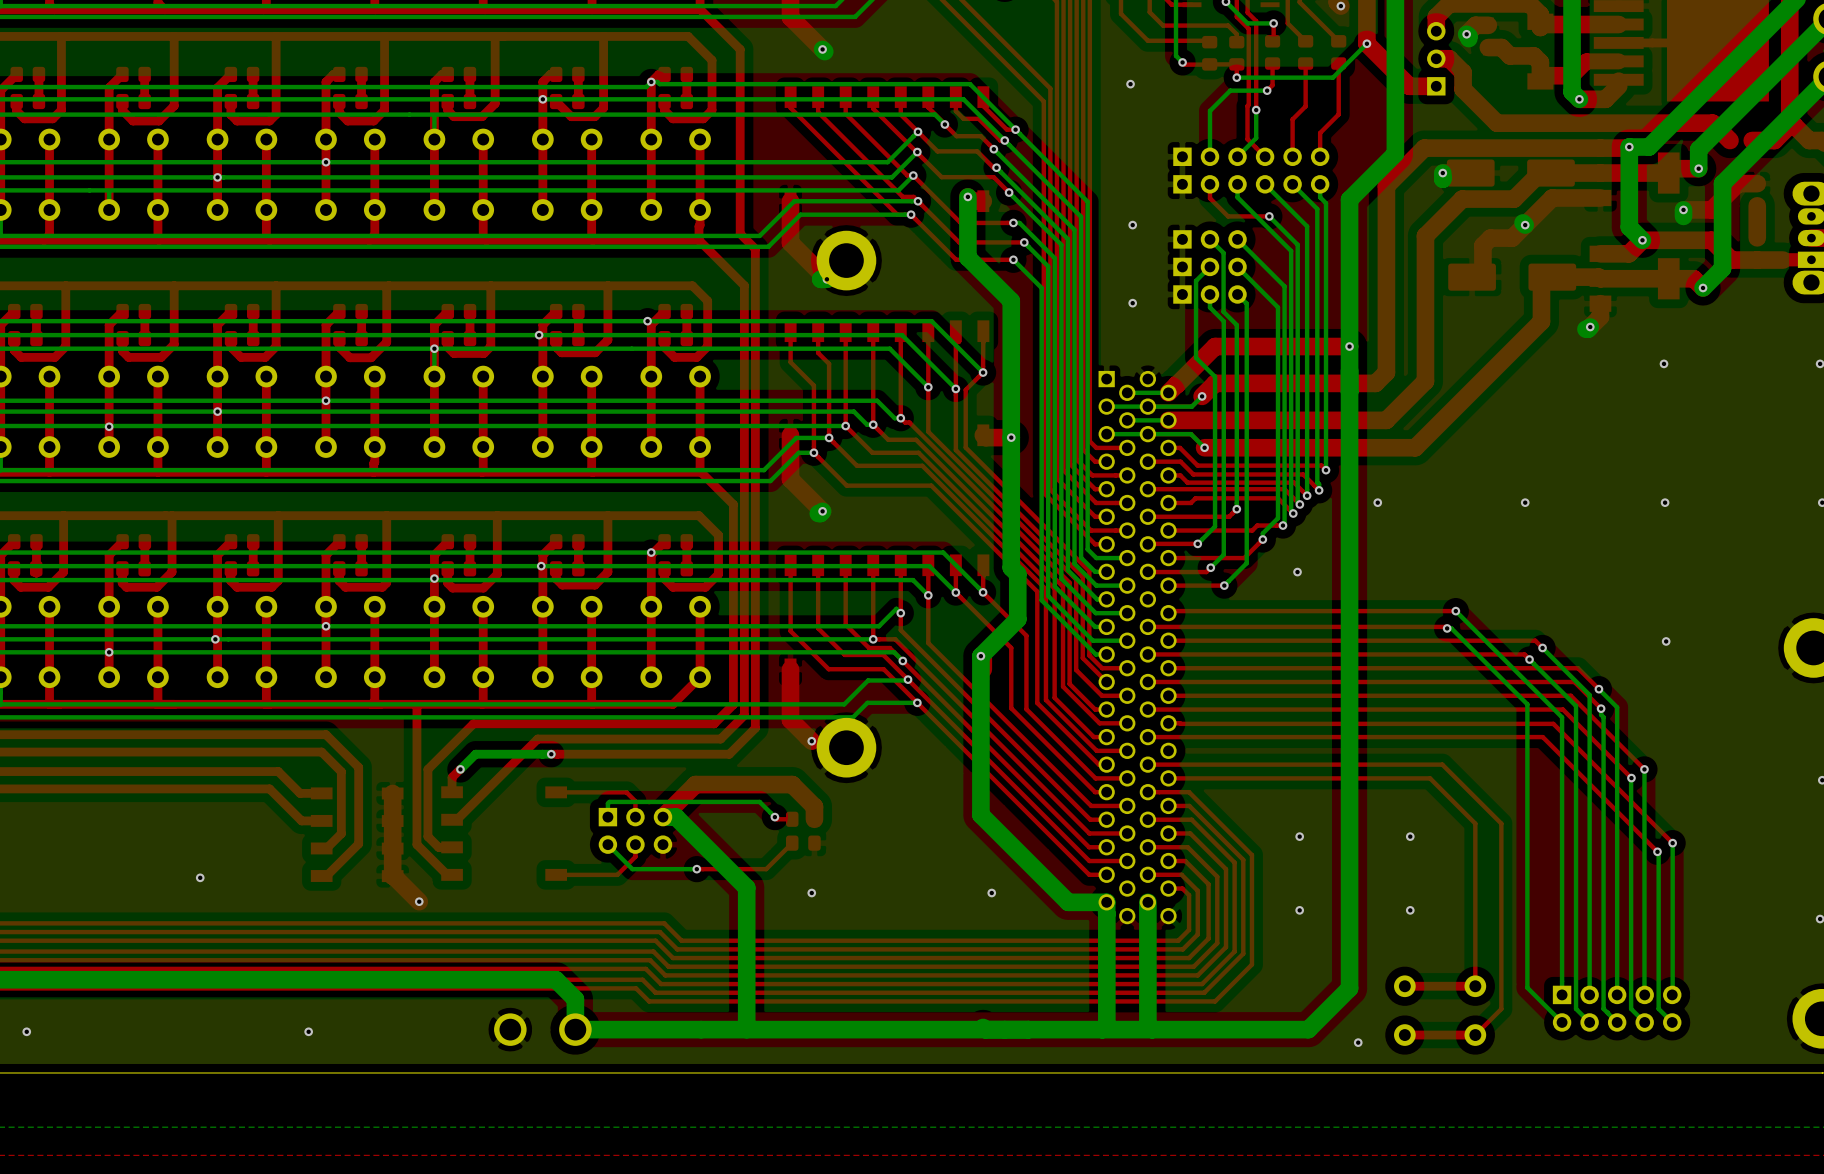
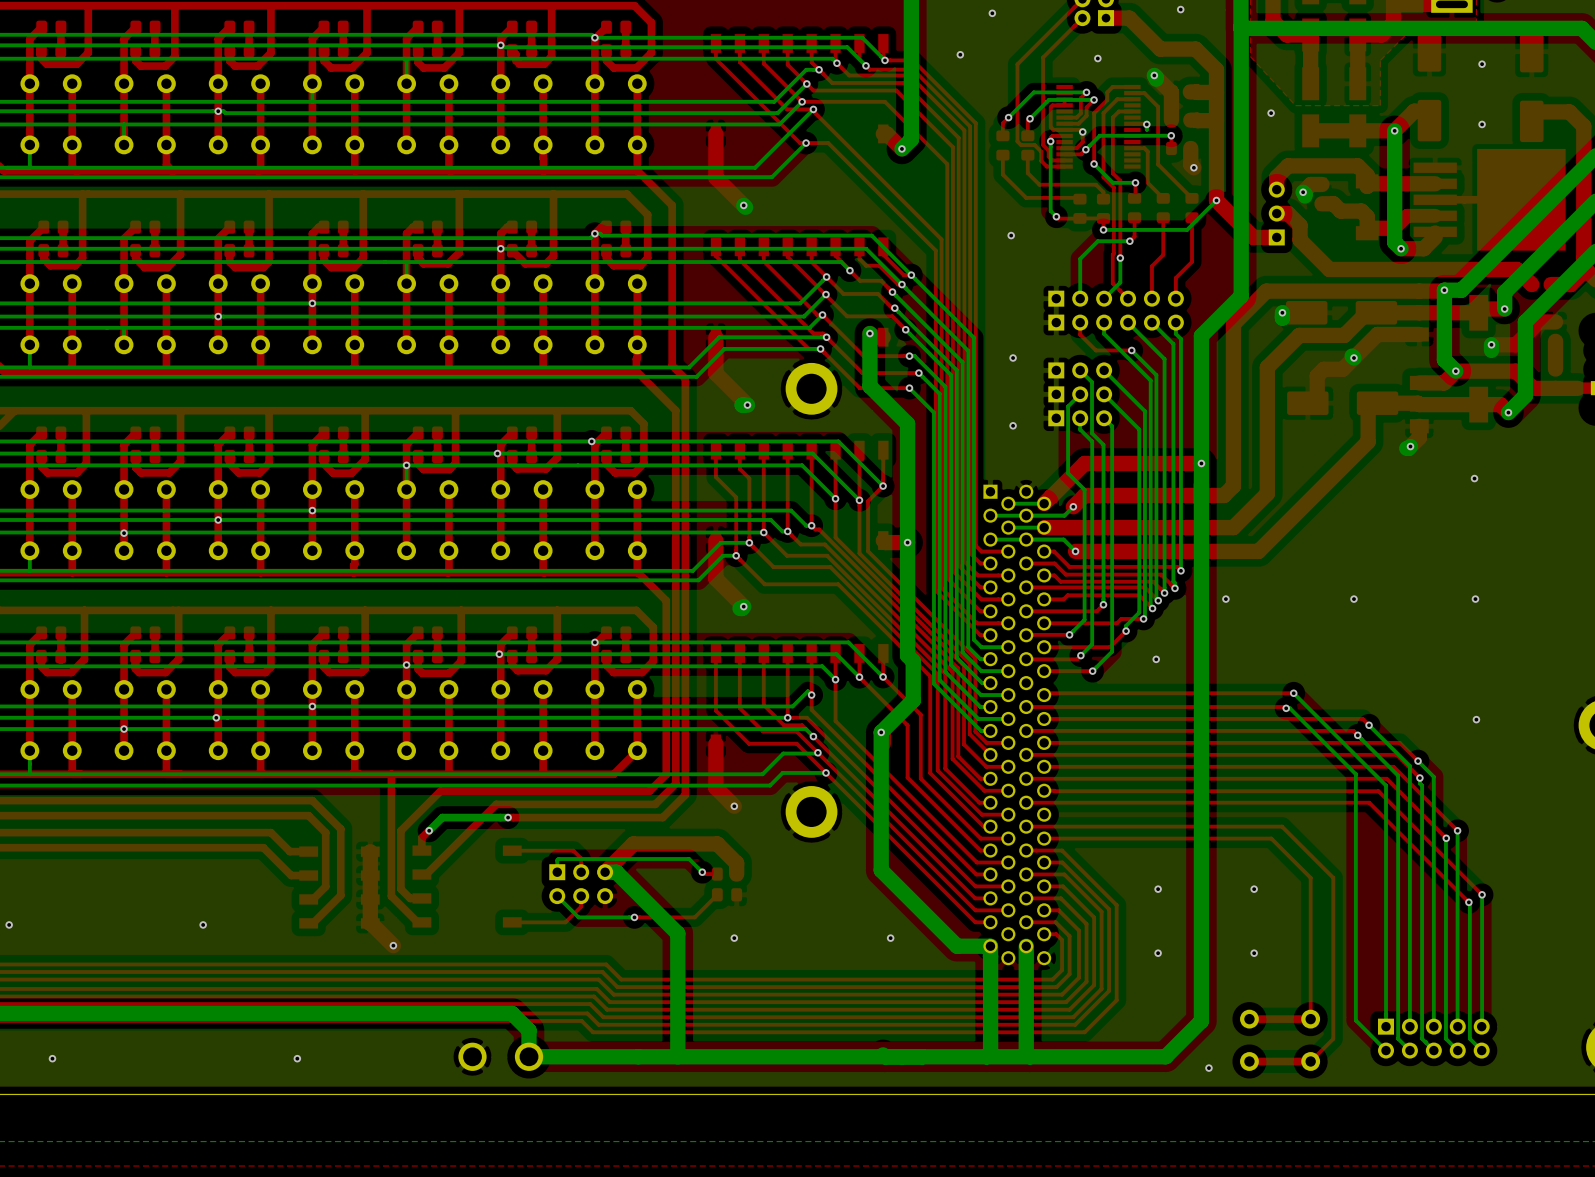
part position: (846, 260) -> (811, 388)
part position: (846, 747) -> (811, 811)

